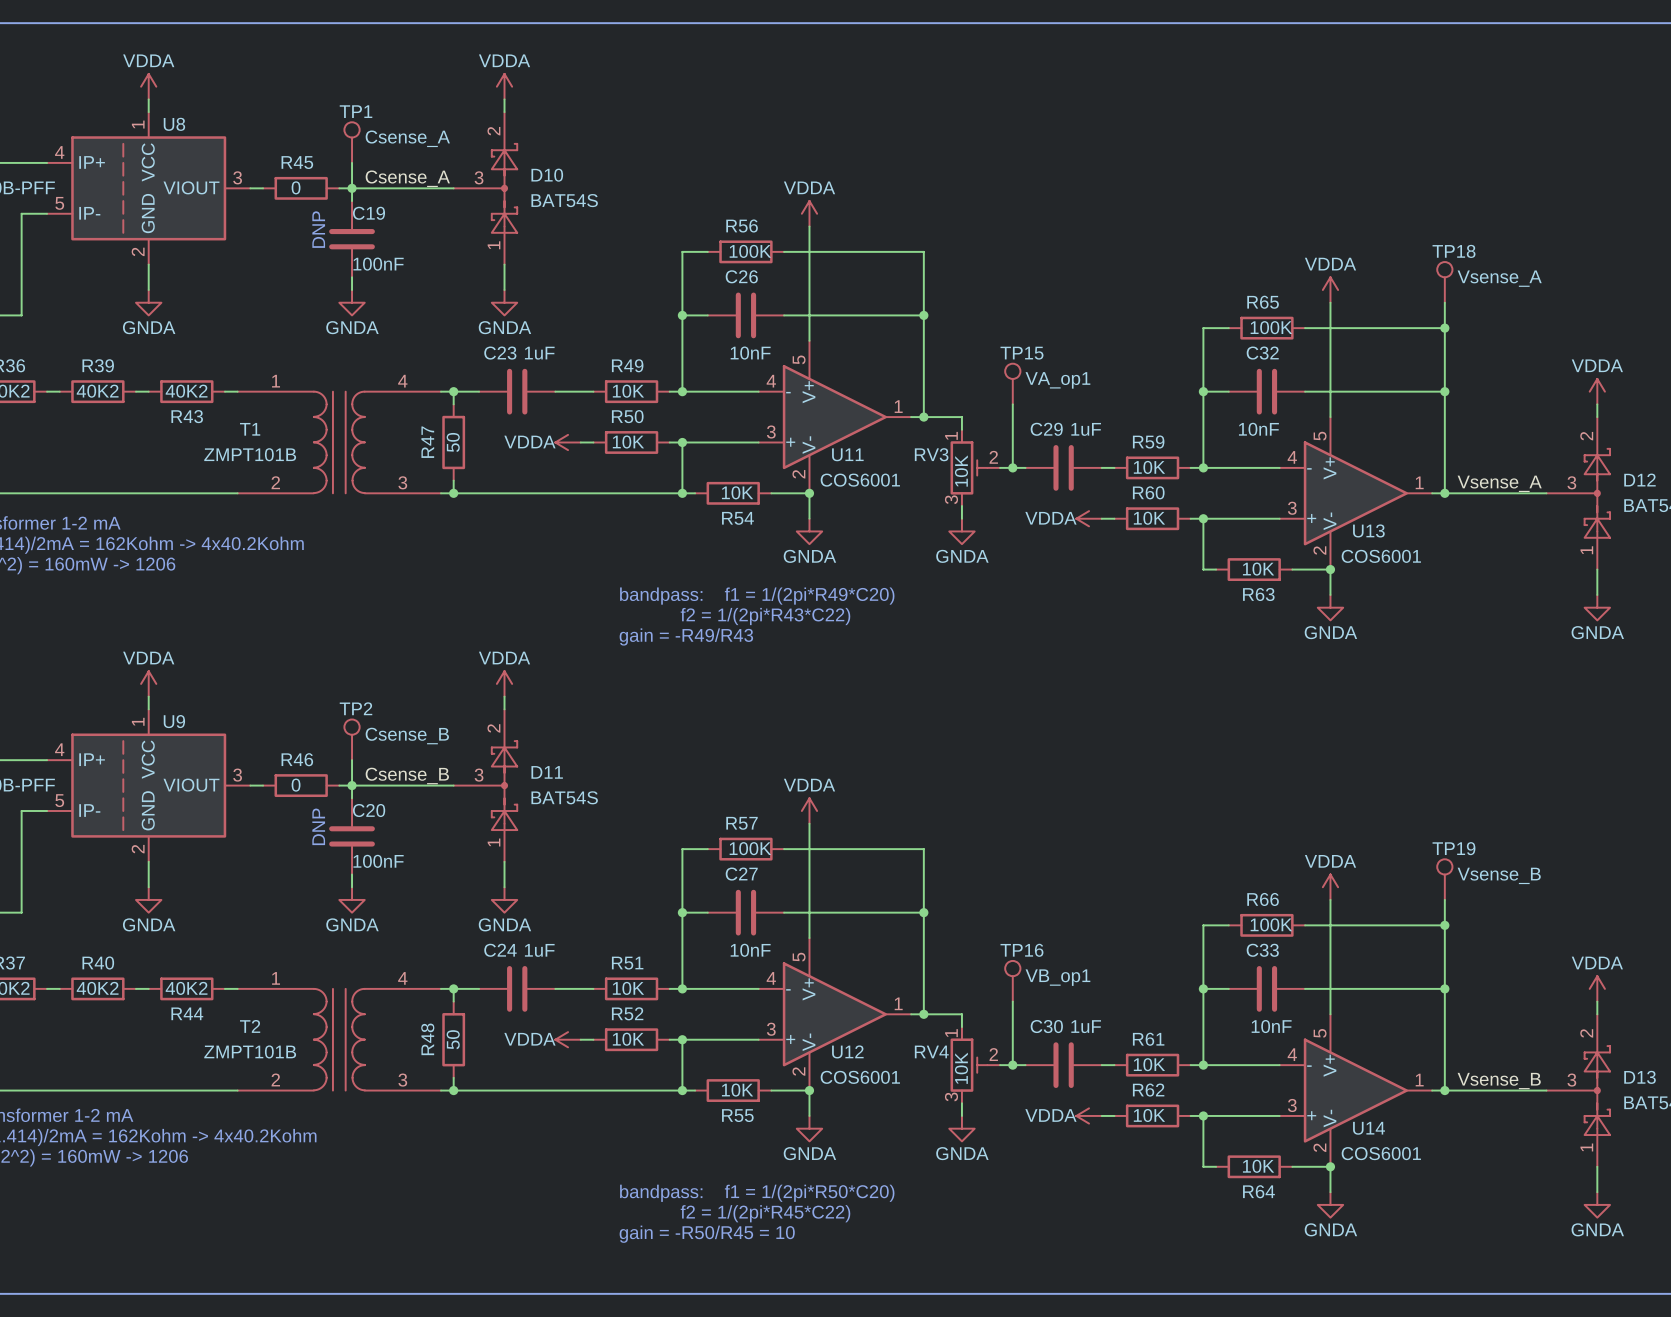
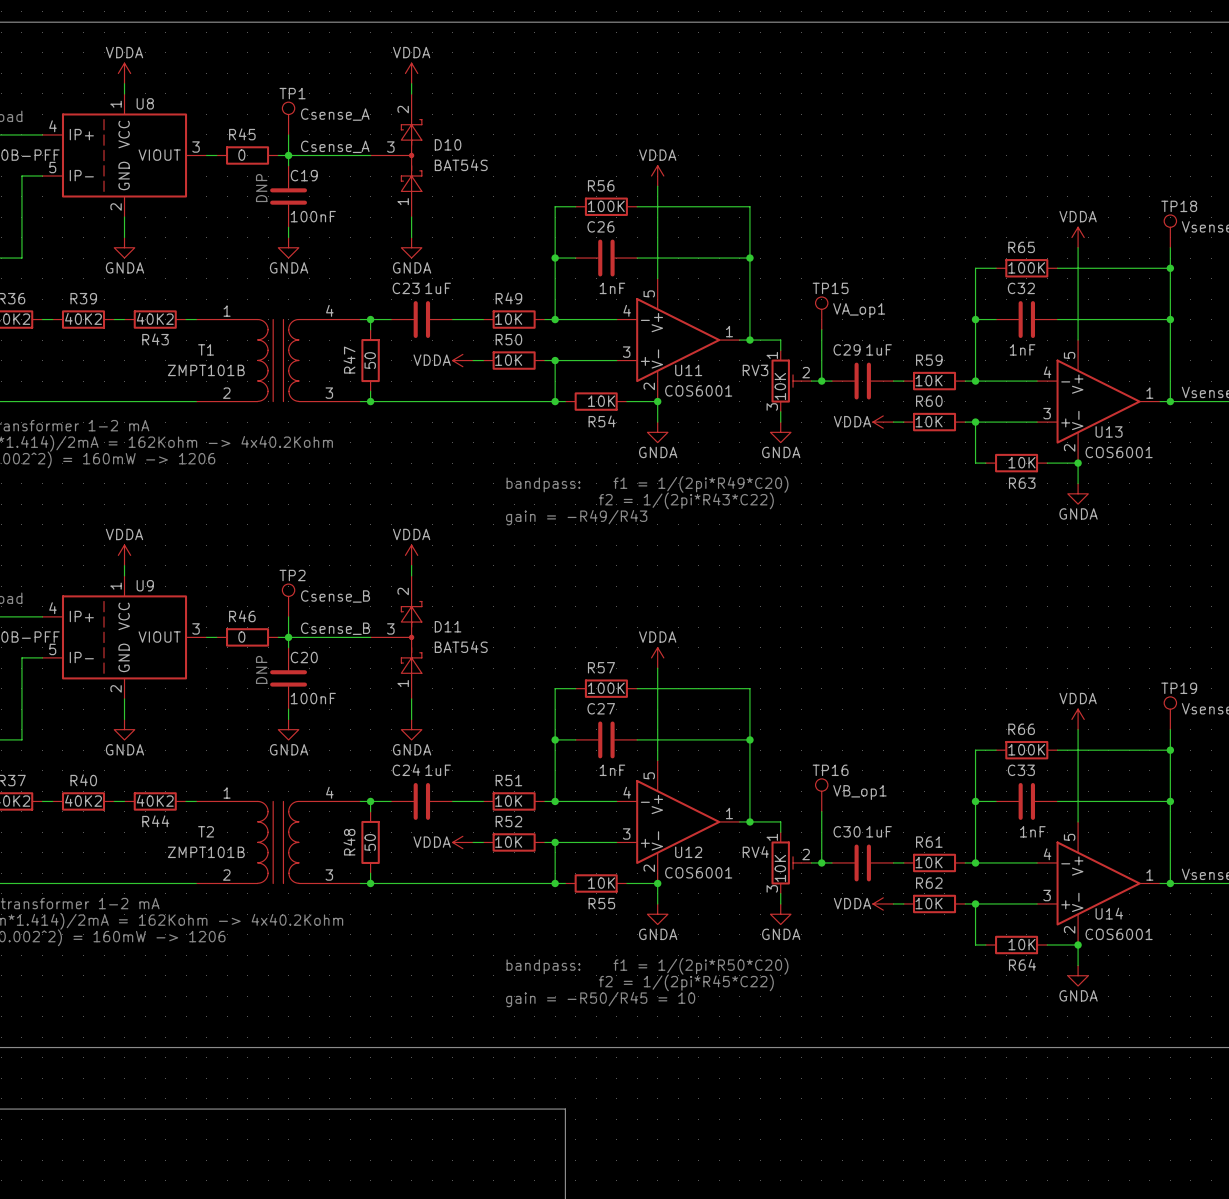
C26 value: 10nF (750, 353) -> 1nF (612, 288)
C32 value: 10nF (1258, 429) -> 1nF (1022, 349)
C27 value: 10nF (750, 950) -> 1nF (612, 770)
C33 value: 10nF (1271, 1026) -> 1nF (1032, 831)

